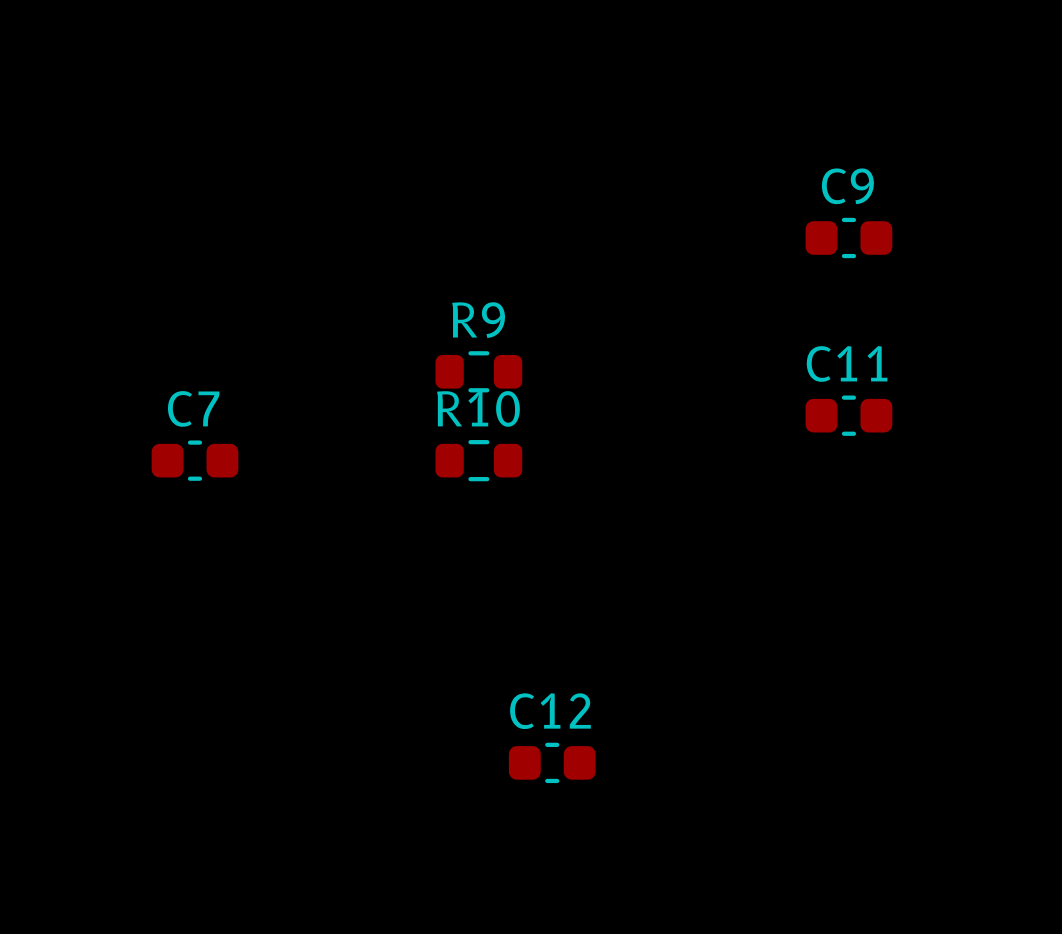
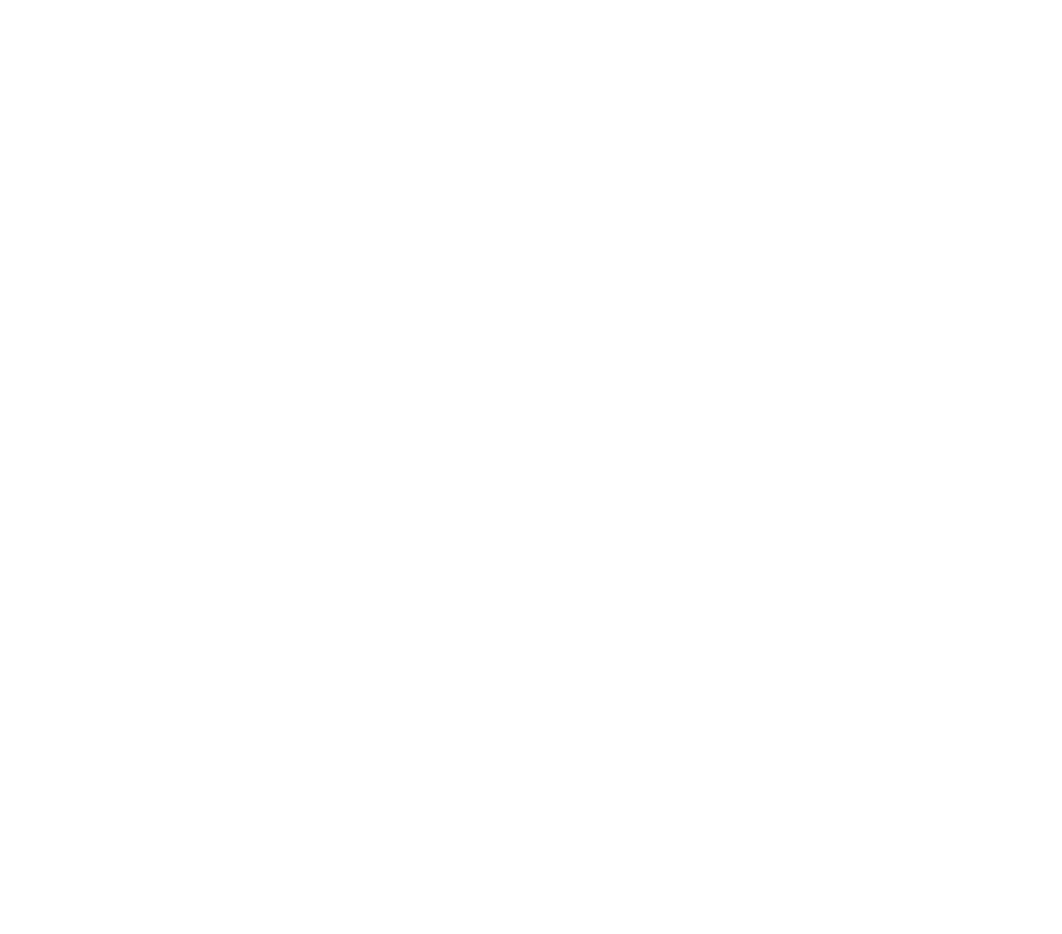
C9: (848, 237) -> none
R9: (478, 371) -> none
C11: (848, 415) -> none
C7: (194, 460) -> none
R10: (478, 460) -> none
C12: (552, 762) -> none

